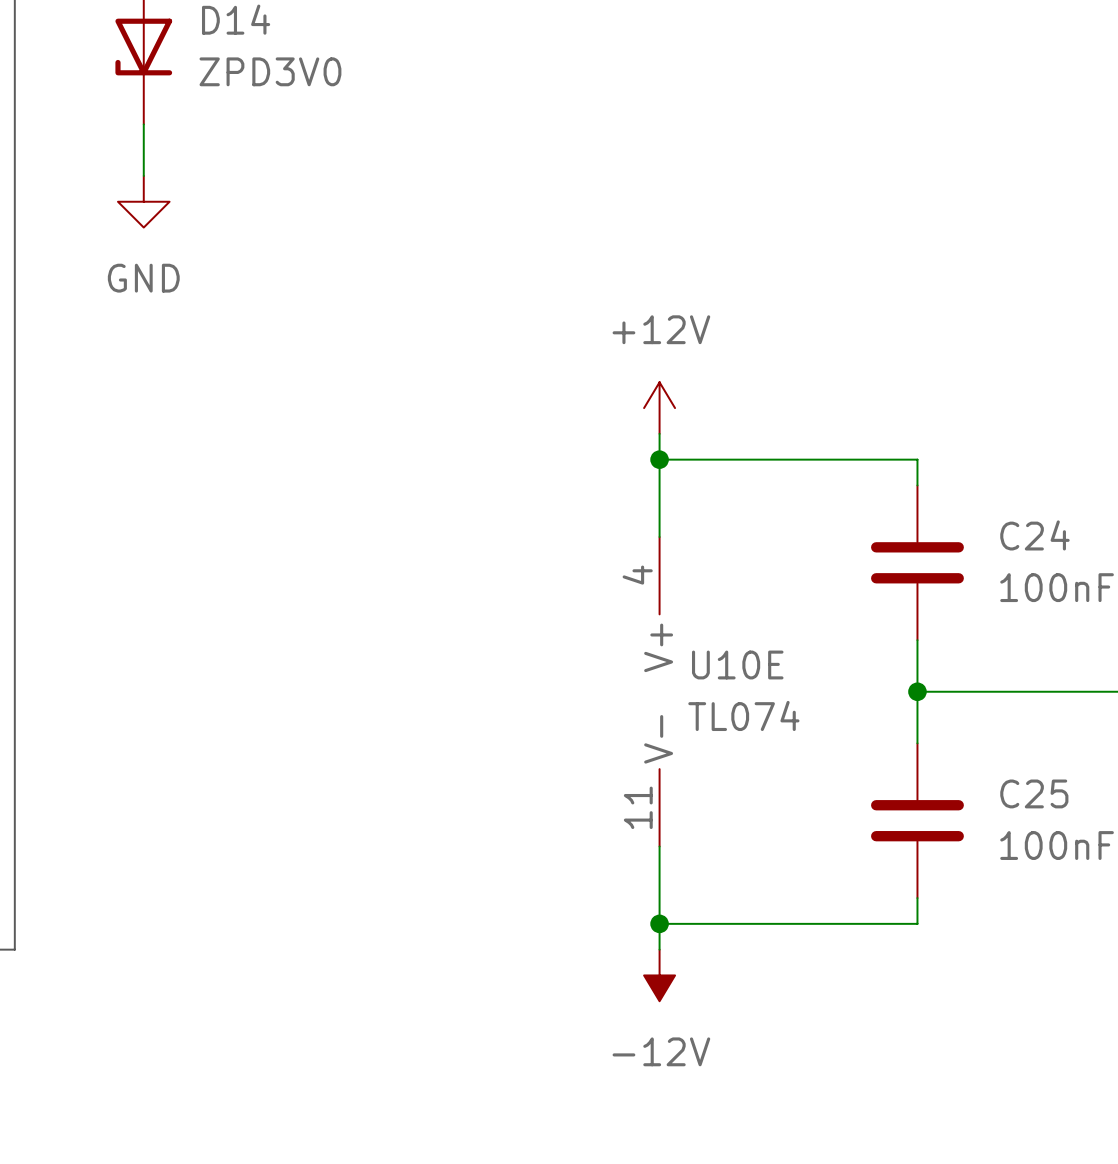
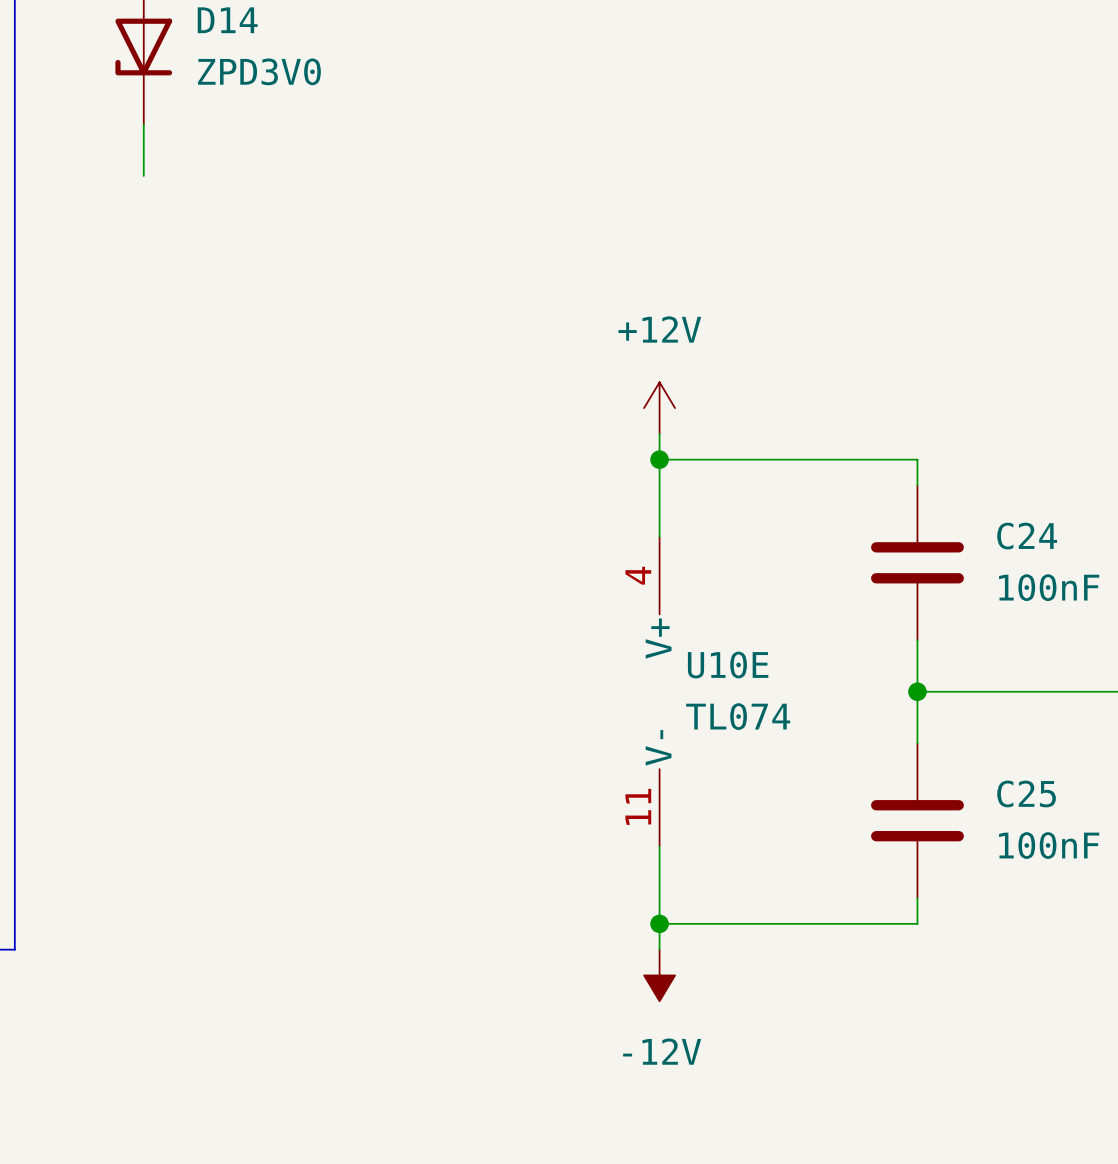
power symbol: GND (143, 201) -> none

